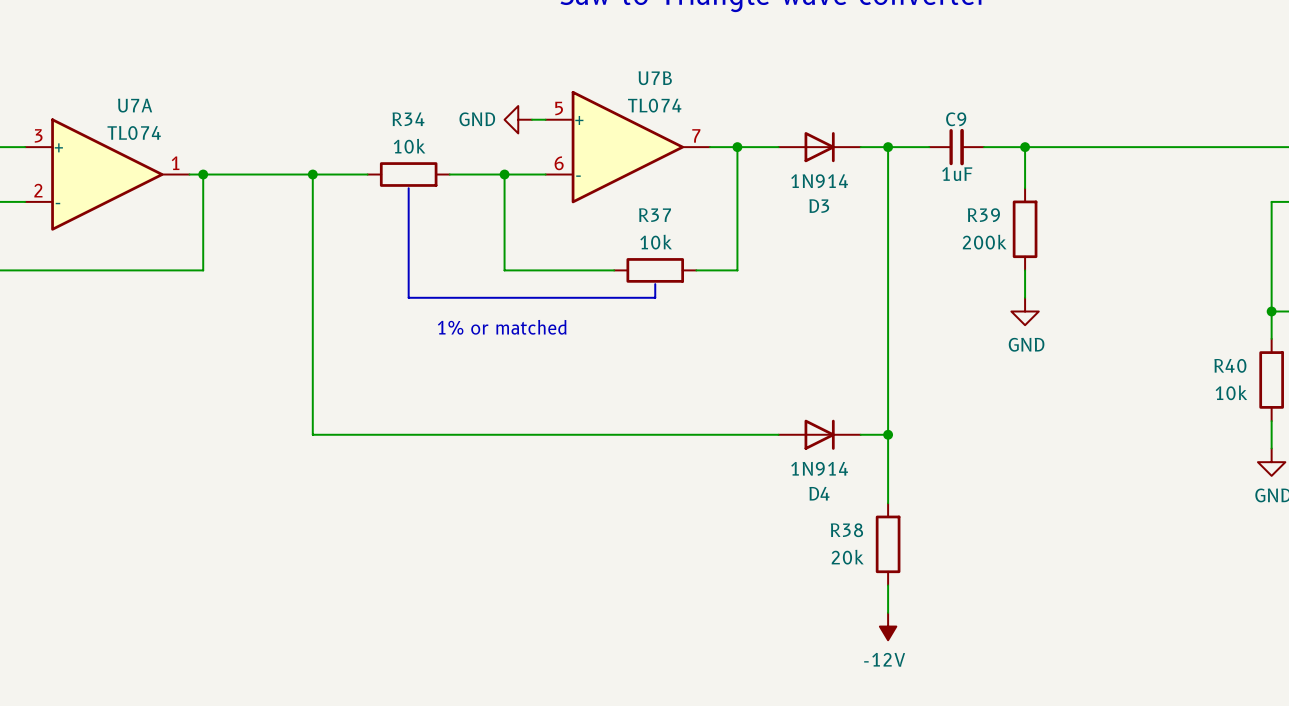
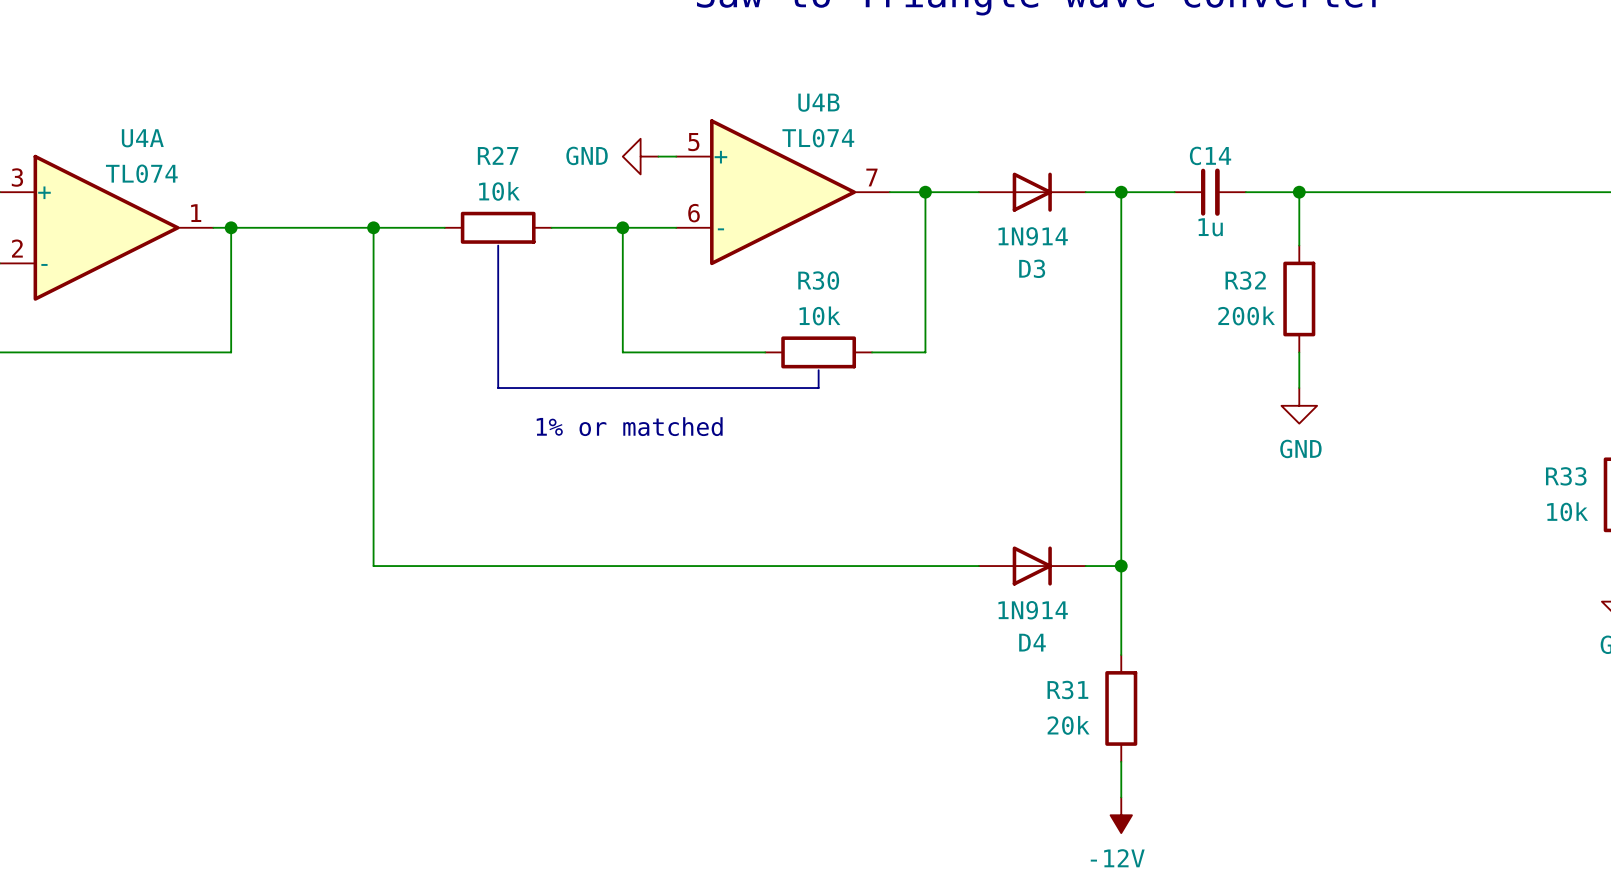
U7B name: U7B (655, 78) -> U4B (818, 102)
U7A name: U7A (135, 105) -> U4A (142, 138)
R34 name: R34 (408, 119) -> R27 (498, 155)
C9 name: C9 (956, 119) -> C14 (1210, 155)
C9 value: 1uF (957, 174) -> 1u (1210, 227)
R37 name: R37 (655, 215) -> R30 (818, 280)
R39 name: R39 (983, 215) -> R32 (1245, 280)
R40 name: R40 (1230, 365) -> R33 (1566, 476)
R38 name: R38 (846, 530) -> R31 (1067, 690)

